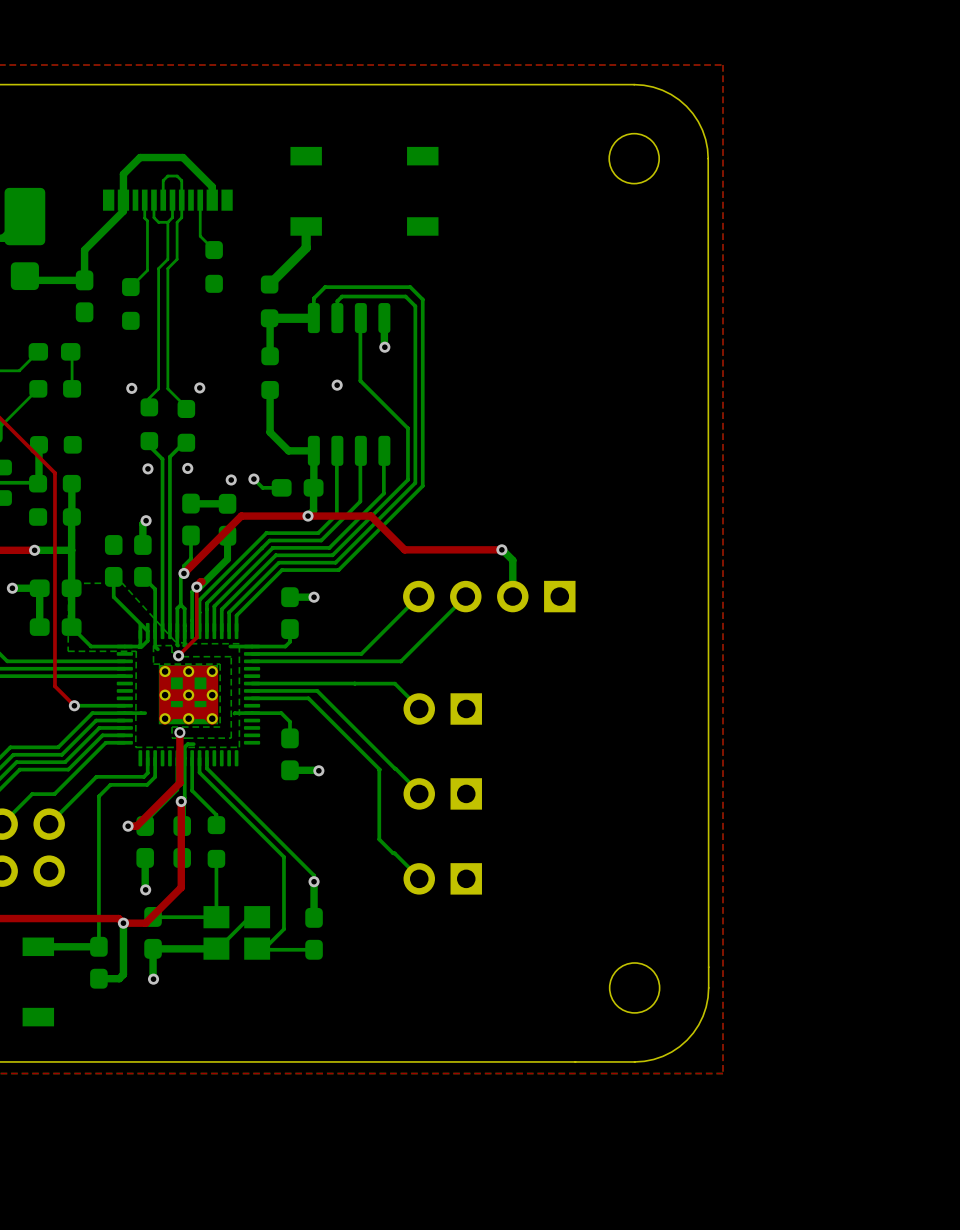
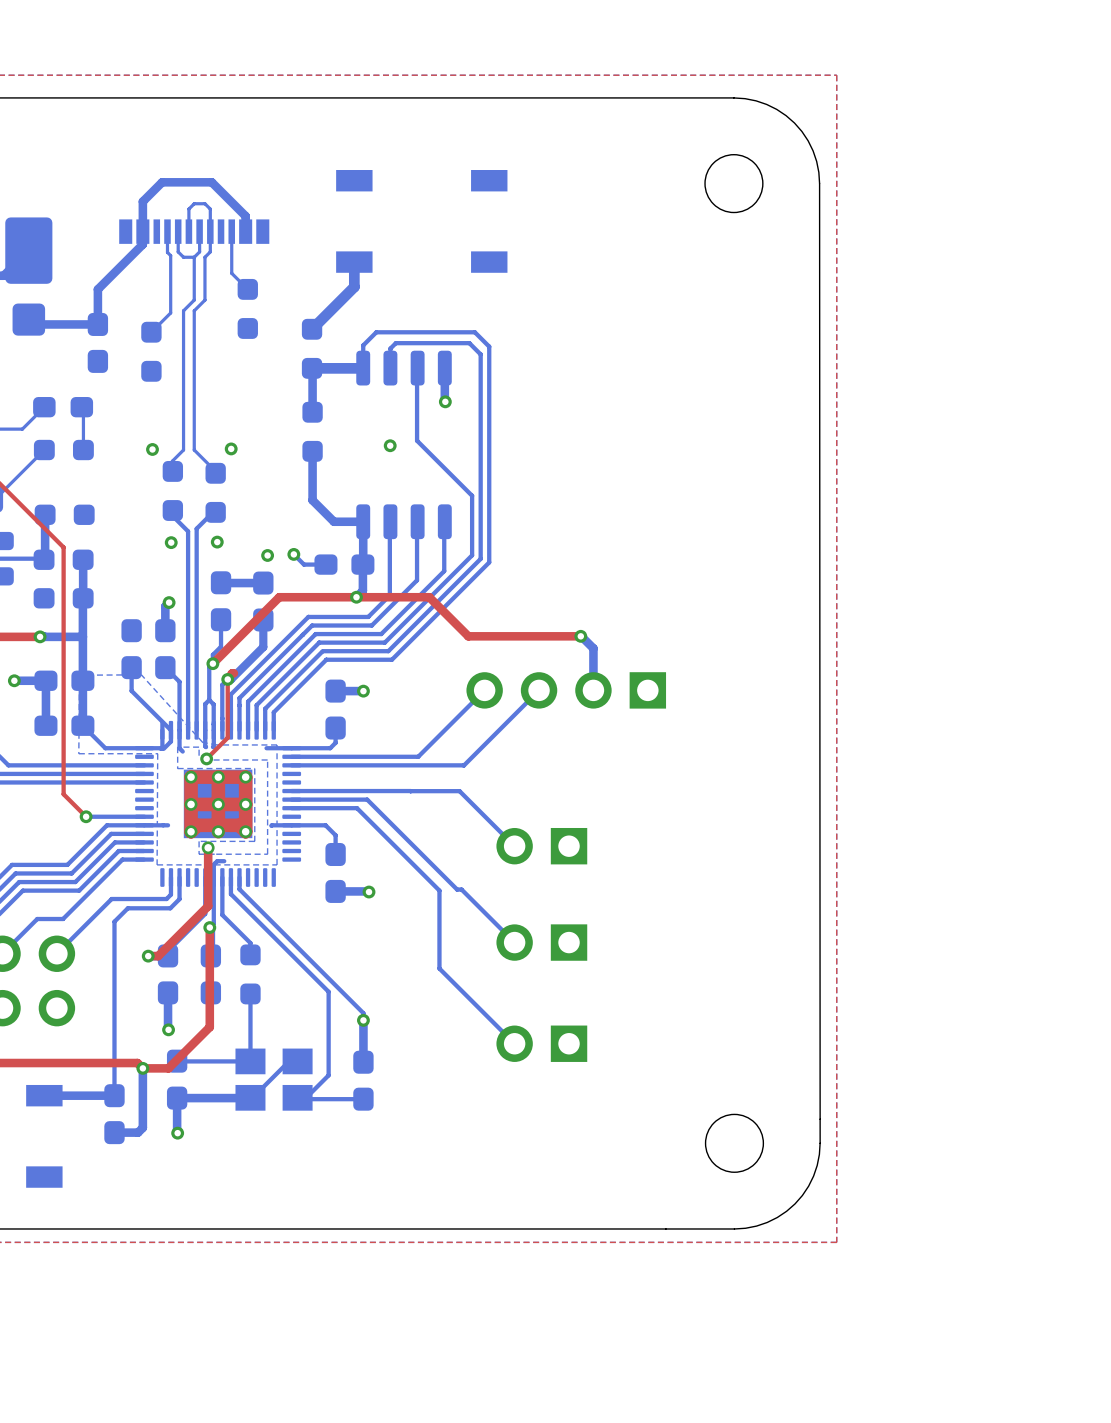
bottom track: (394, 683) (417, 706) -> (457, 791) (459, 791) (514, 846)
part: (442, 708) -> none
part: none -> (541, 846)
bottom track: (395, 768) (418, 791) -> (457, 889) (461, 889) (514, 942)
bottom track: (379, 769) (379, 839) (417, 876) -> (439, 890) (439, 968) (514, 1043)
part position: (442, 793) -> (541, 942)
part position: (442, 878) -> (541, 1043)

